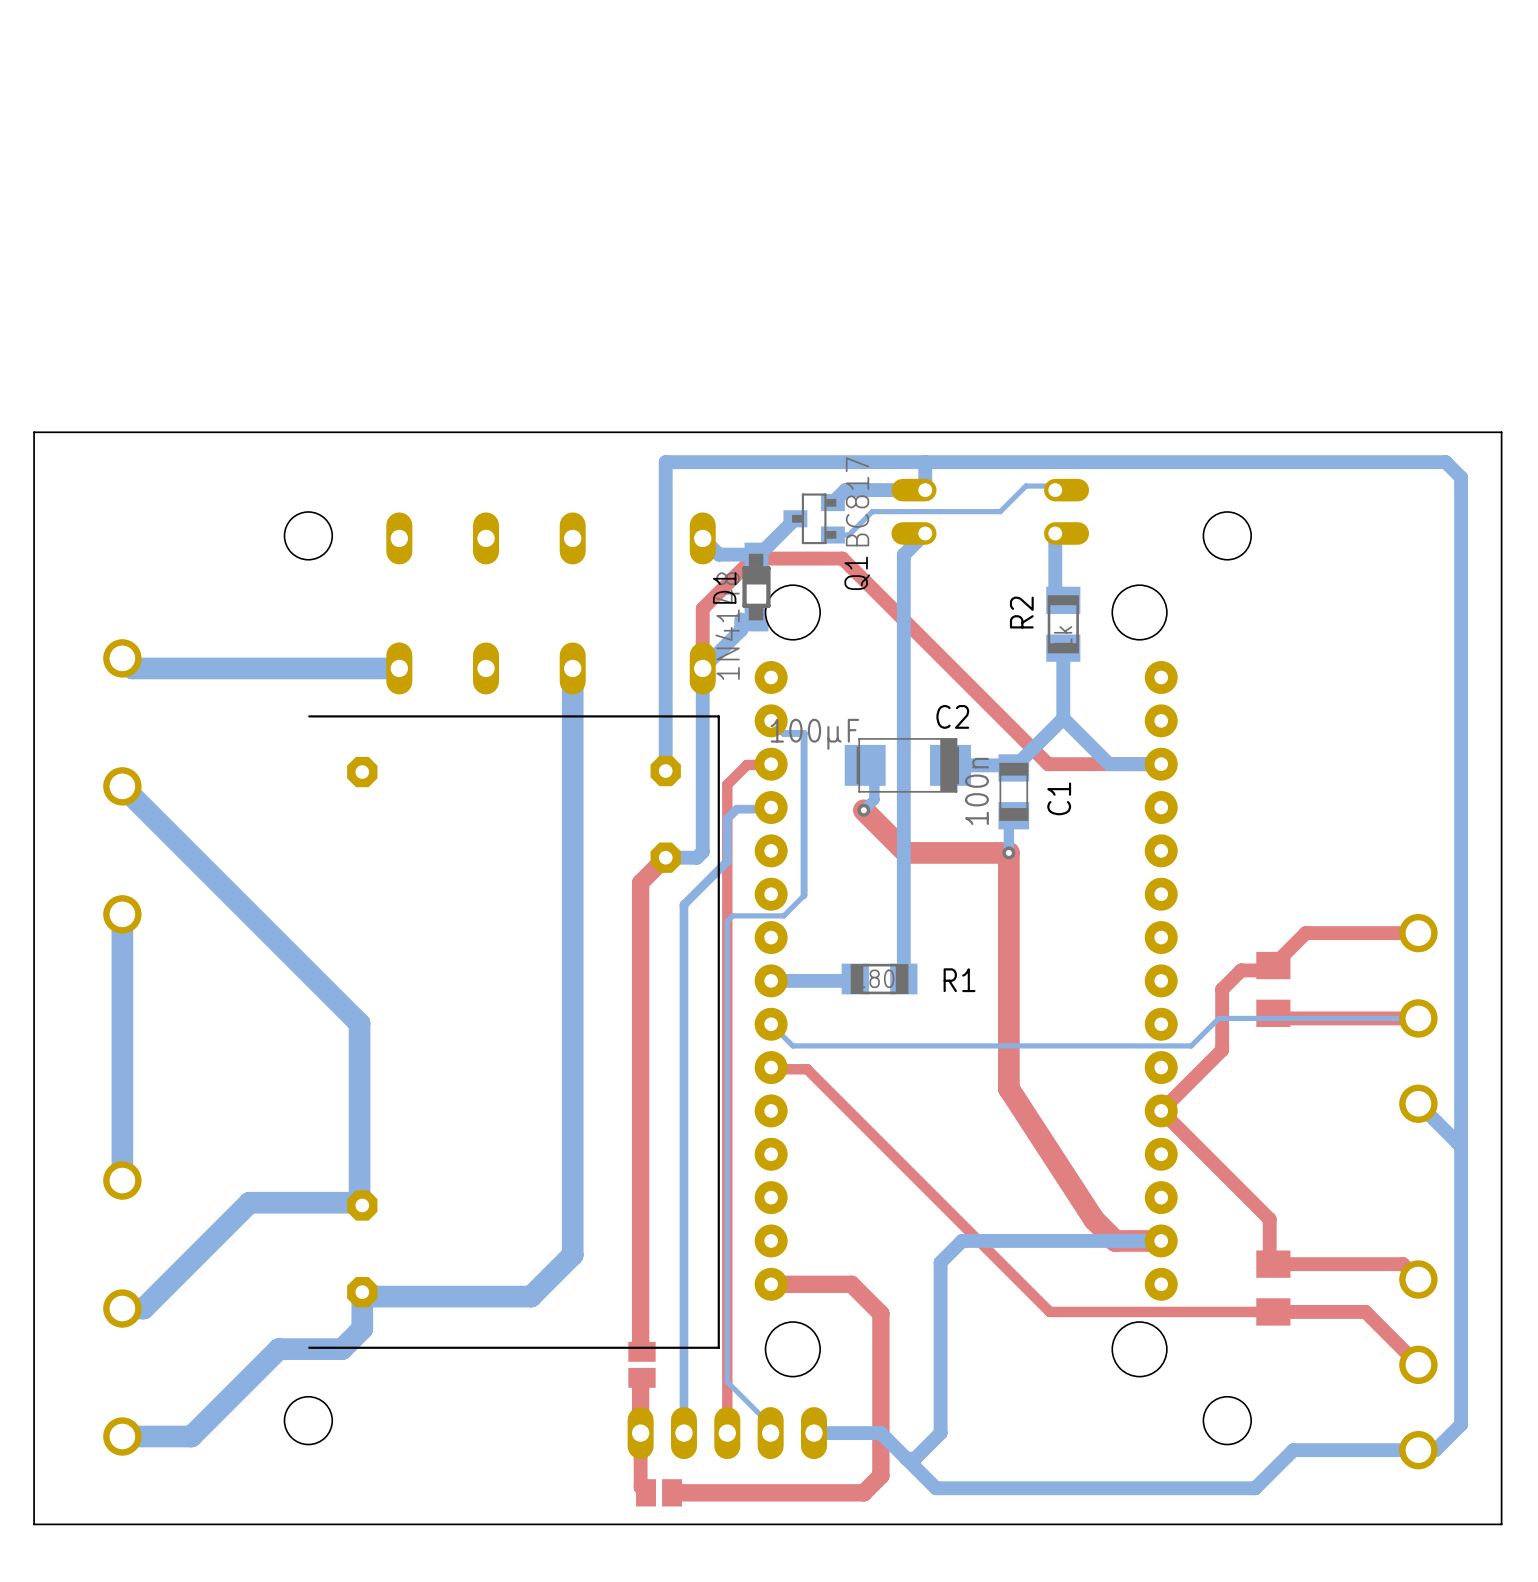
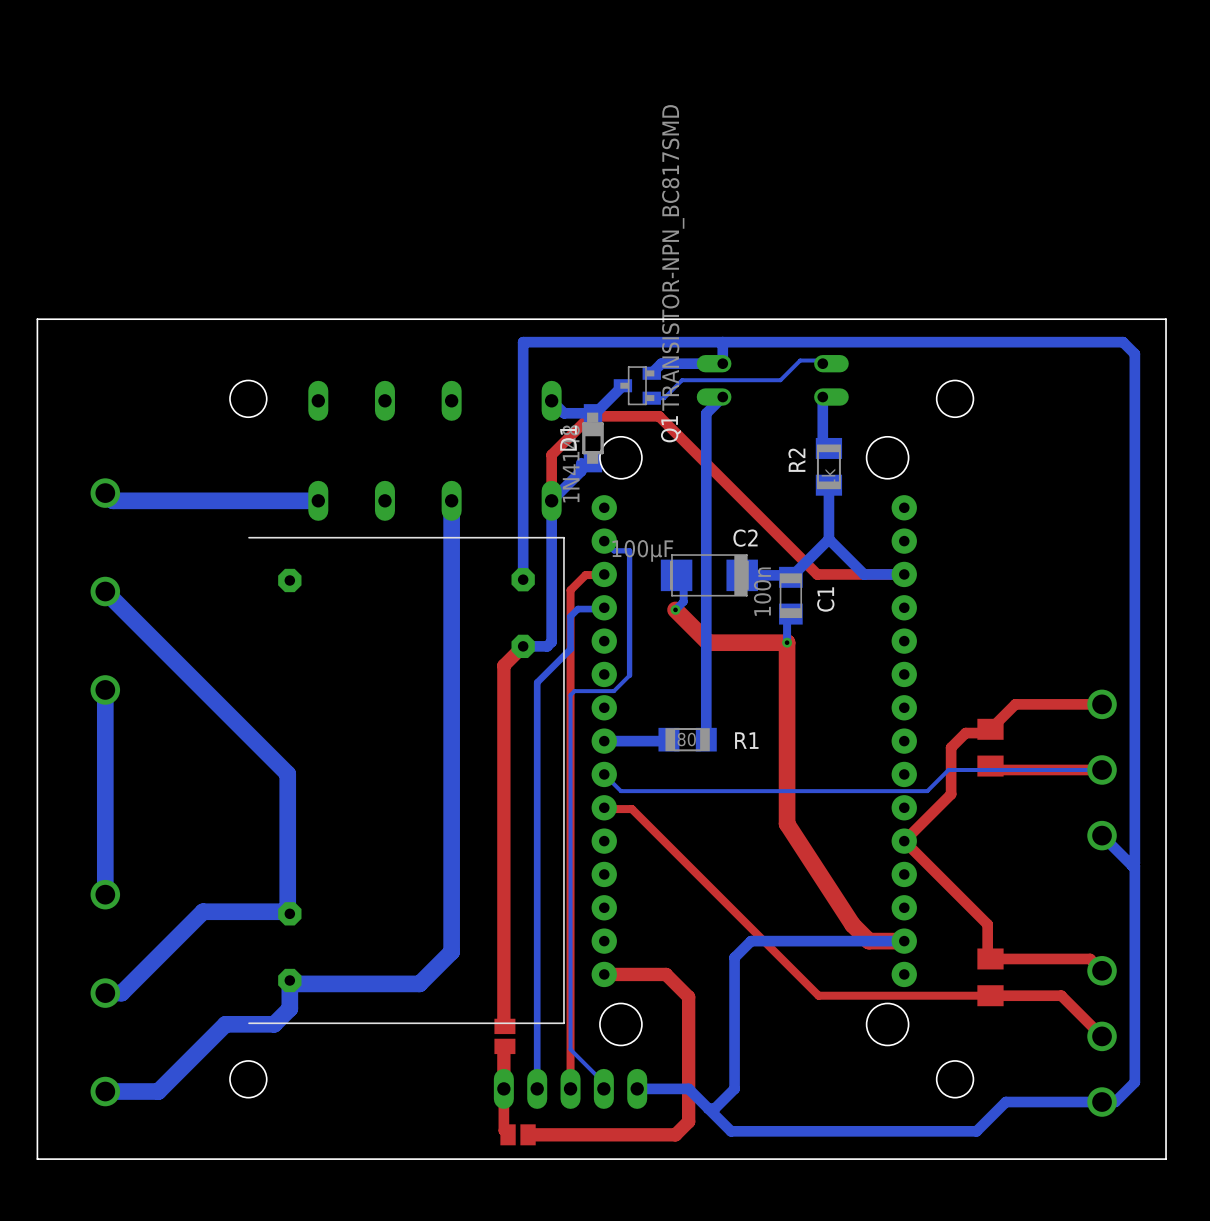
Q1 value: BC817 (857, 501) -> TRANSISTOR-NPN_BC817SMD (673, 257)

